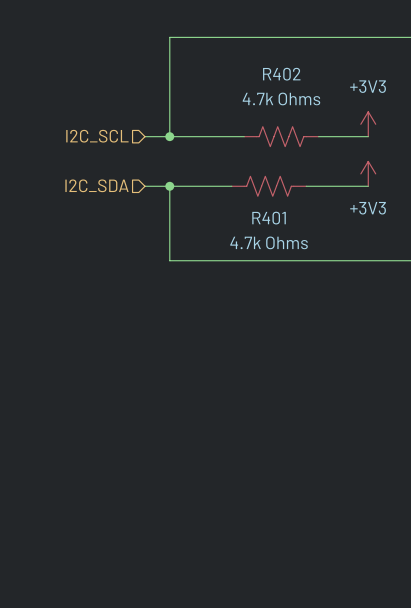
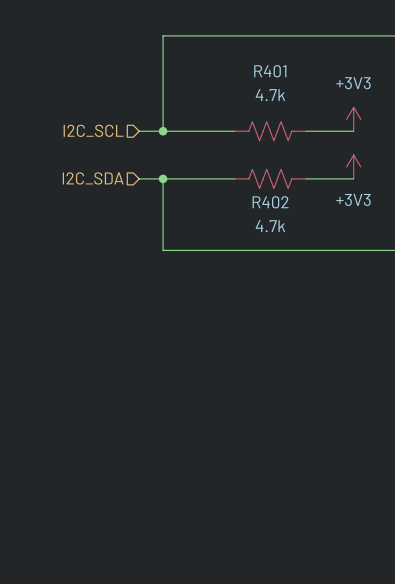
R402 name: R402 (281, 74) -> R401 (270, 71)
R402 value: 4.7k Ohms (281, 98) -> 4.7k (270, 95)
R401: 4.7k Ohms (269, 186) -> none
R402: none -> 4.7k (270, 178)

